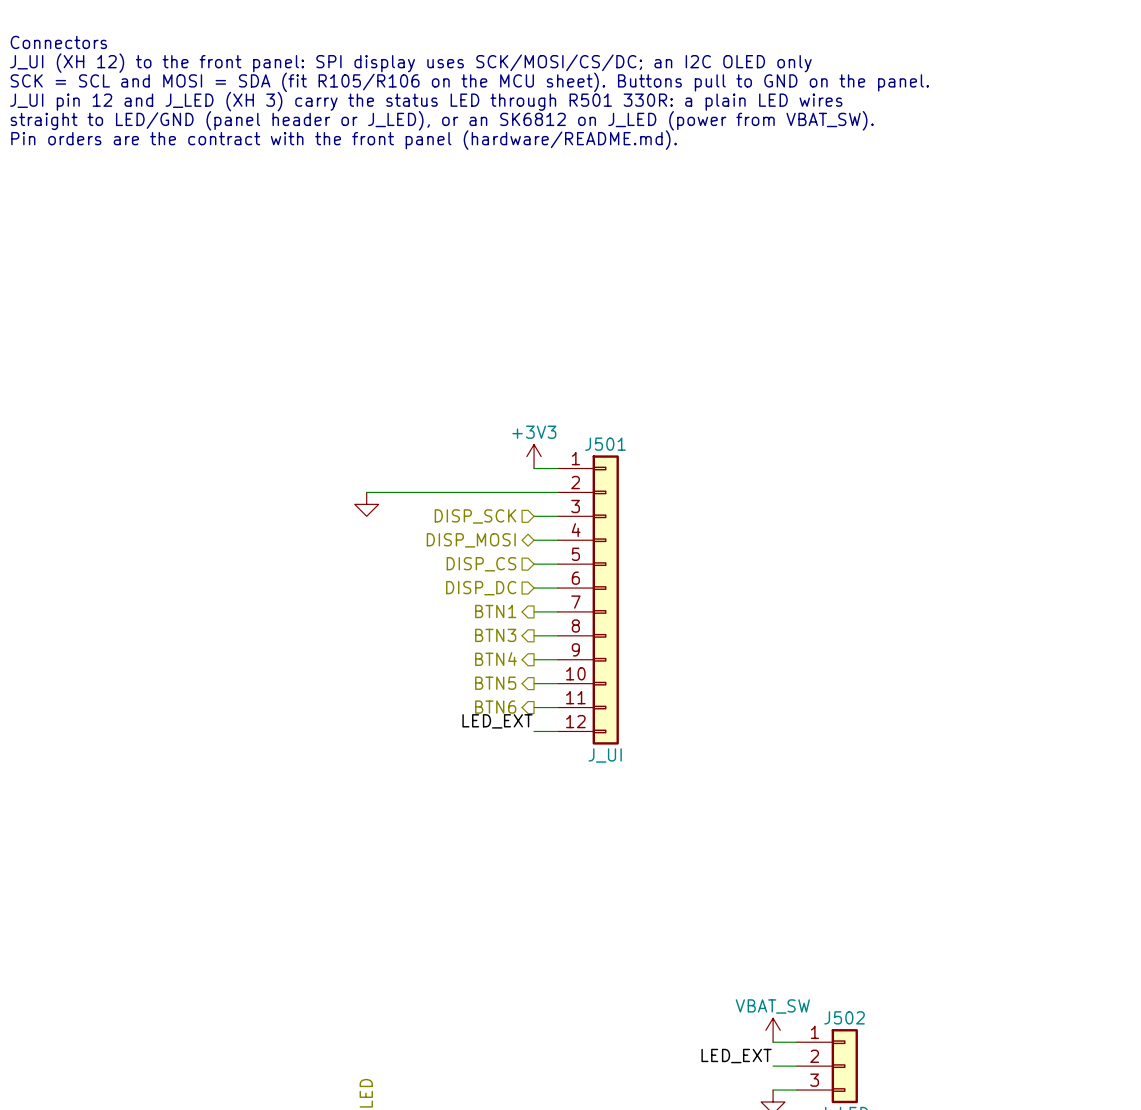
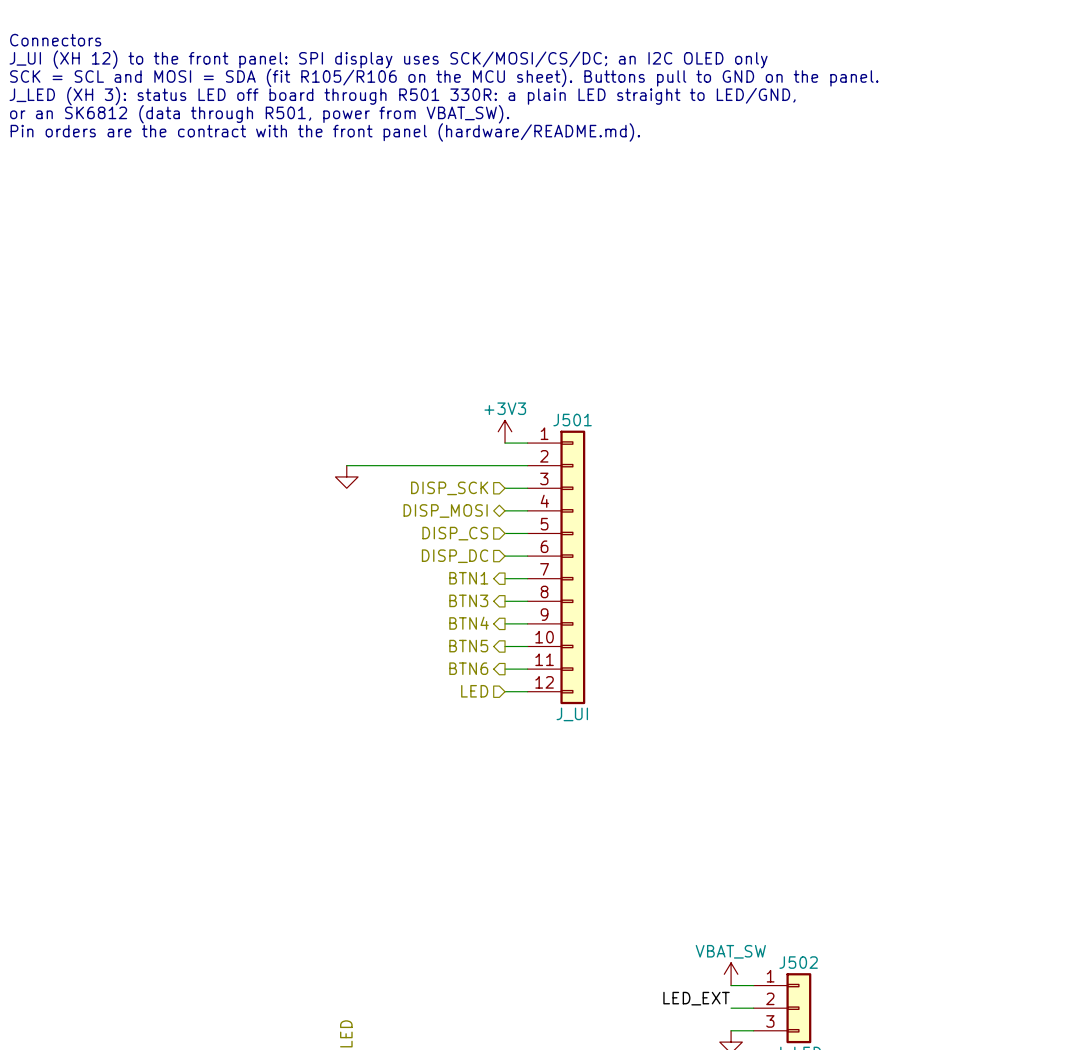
text: J_UI pin 12 and J_LED (XH 3) carry the status LED through R501 330R: a plain LED wires (426, 101) -> J_LED (XH 3): status LED off board through R501 330R: a plain LED straight to LED/GND, (402, 96)
text: straight to LED/GND (panel header or J_LED), or an SK6812 on J_LED (power from VBAT_SW). (442, 120) -> or an SK6812 (data through R501, power from VBAT_SW). (259, 114)
label: LED_EXT (497, 721) -> none
hierarchical label: none -> LED (474, 691)

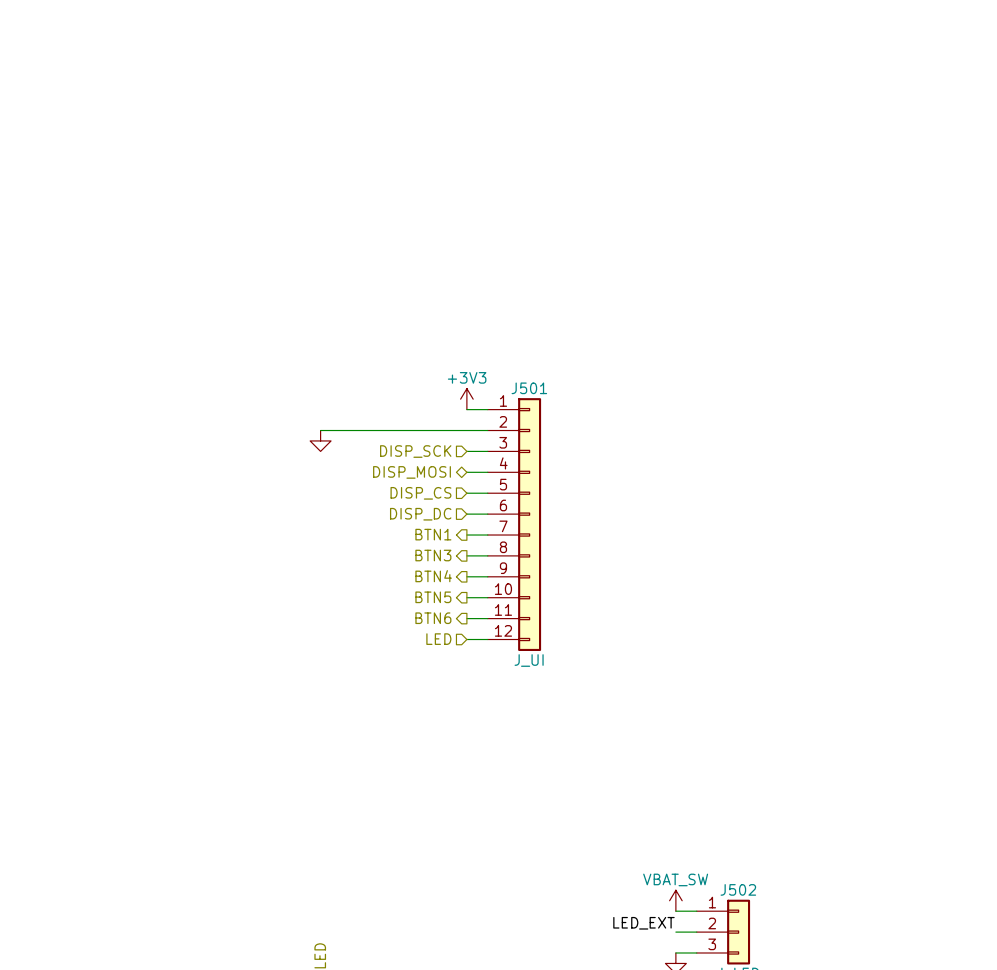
text: Connectors (55, 40) -> none
text: J_UI (XH 12) to the front panel: SPI display uses SCK/MOSI/CS/DC; an I2C OLED only (388, 59) -> none
text: SCK = SCL and MOSI = SDA (fit R105/R106 on the MCU sheet). Buttons pull to GND on the panel. (444, 77) -> none
text: J_LED (XH 3): status LED off board through R501 330R: a plain LED straight to LED/GND, (402, 96) -> none
text: or an SK6812 (data through R501, power from VBAT_SW). (259, 114) -> none
text: Pin orders are the contract with the front panel (hardware/README.md). (325, 132) -> none

